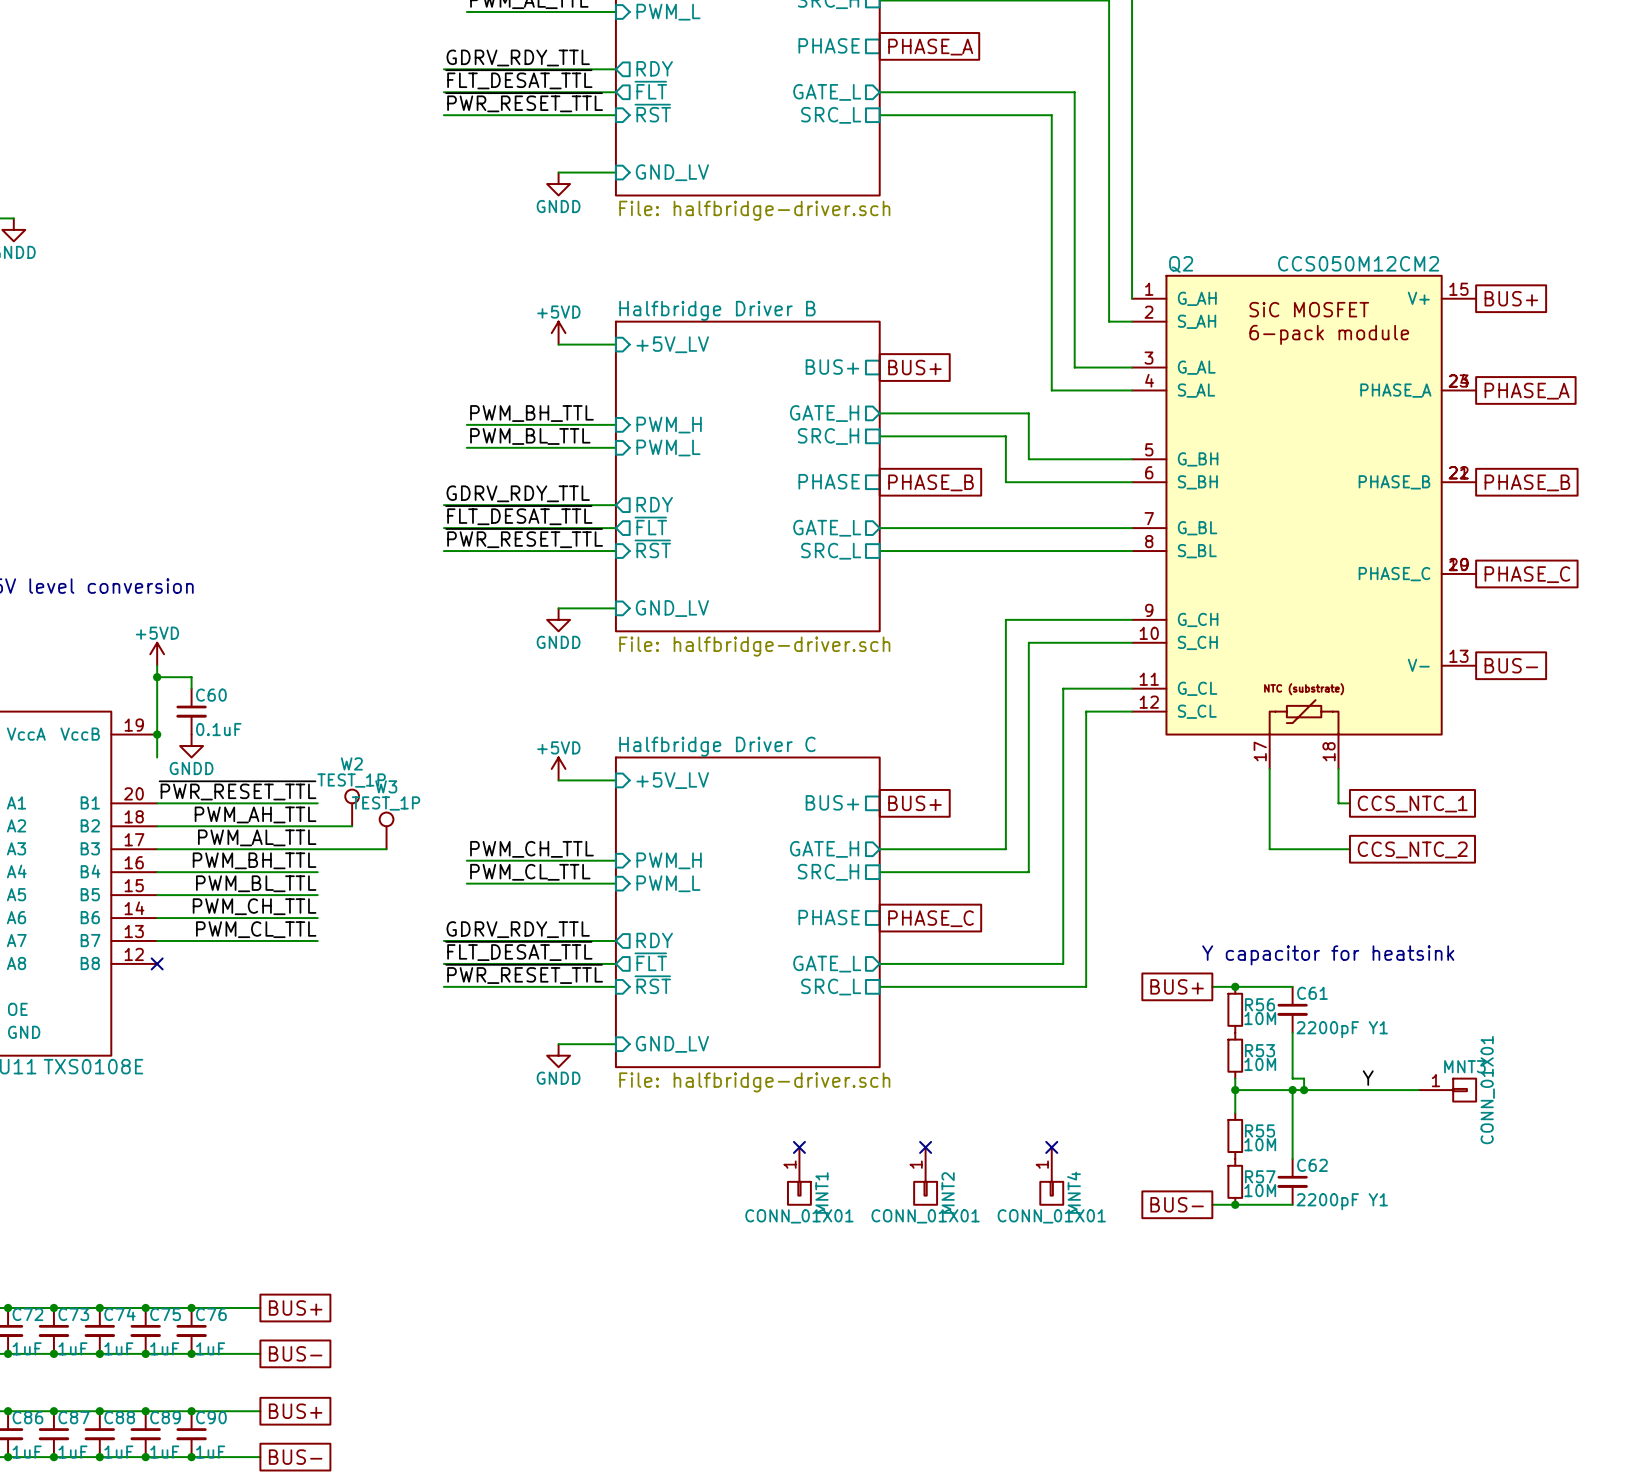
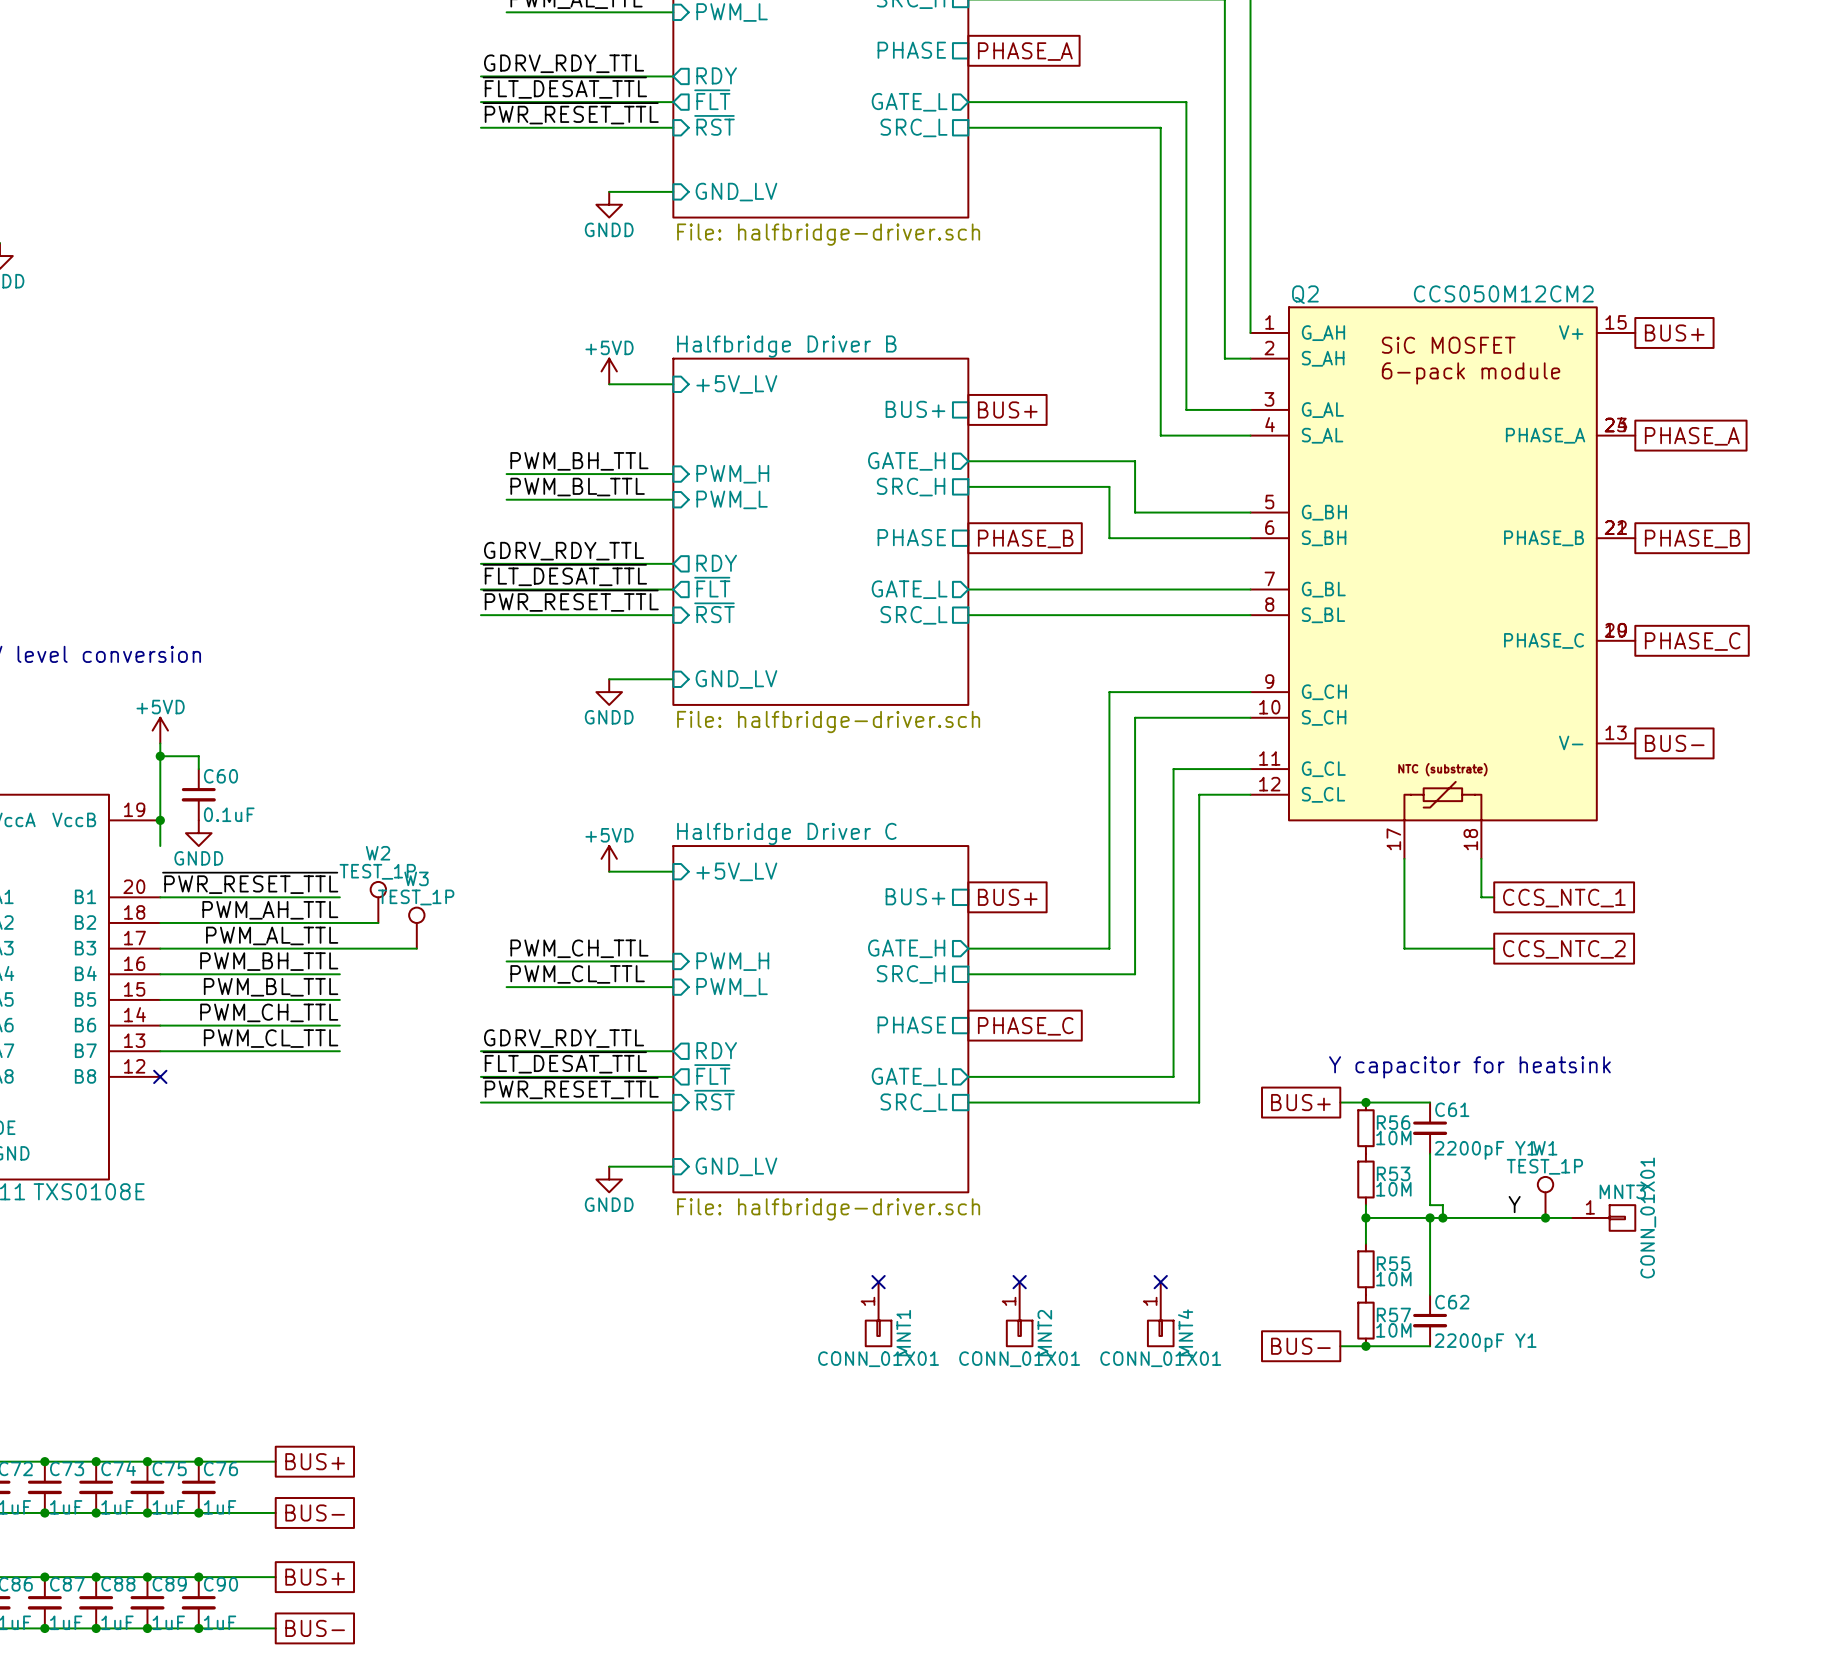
W1: none -> TEST_1P (1545, 1197)
junction: none -> (1545, 1217)

